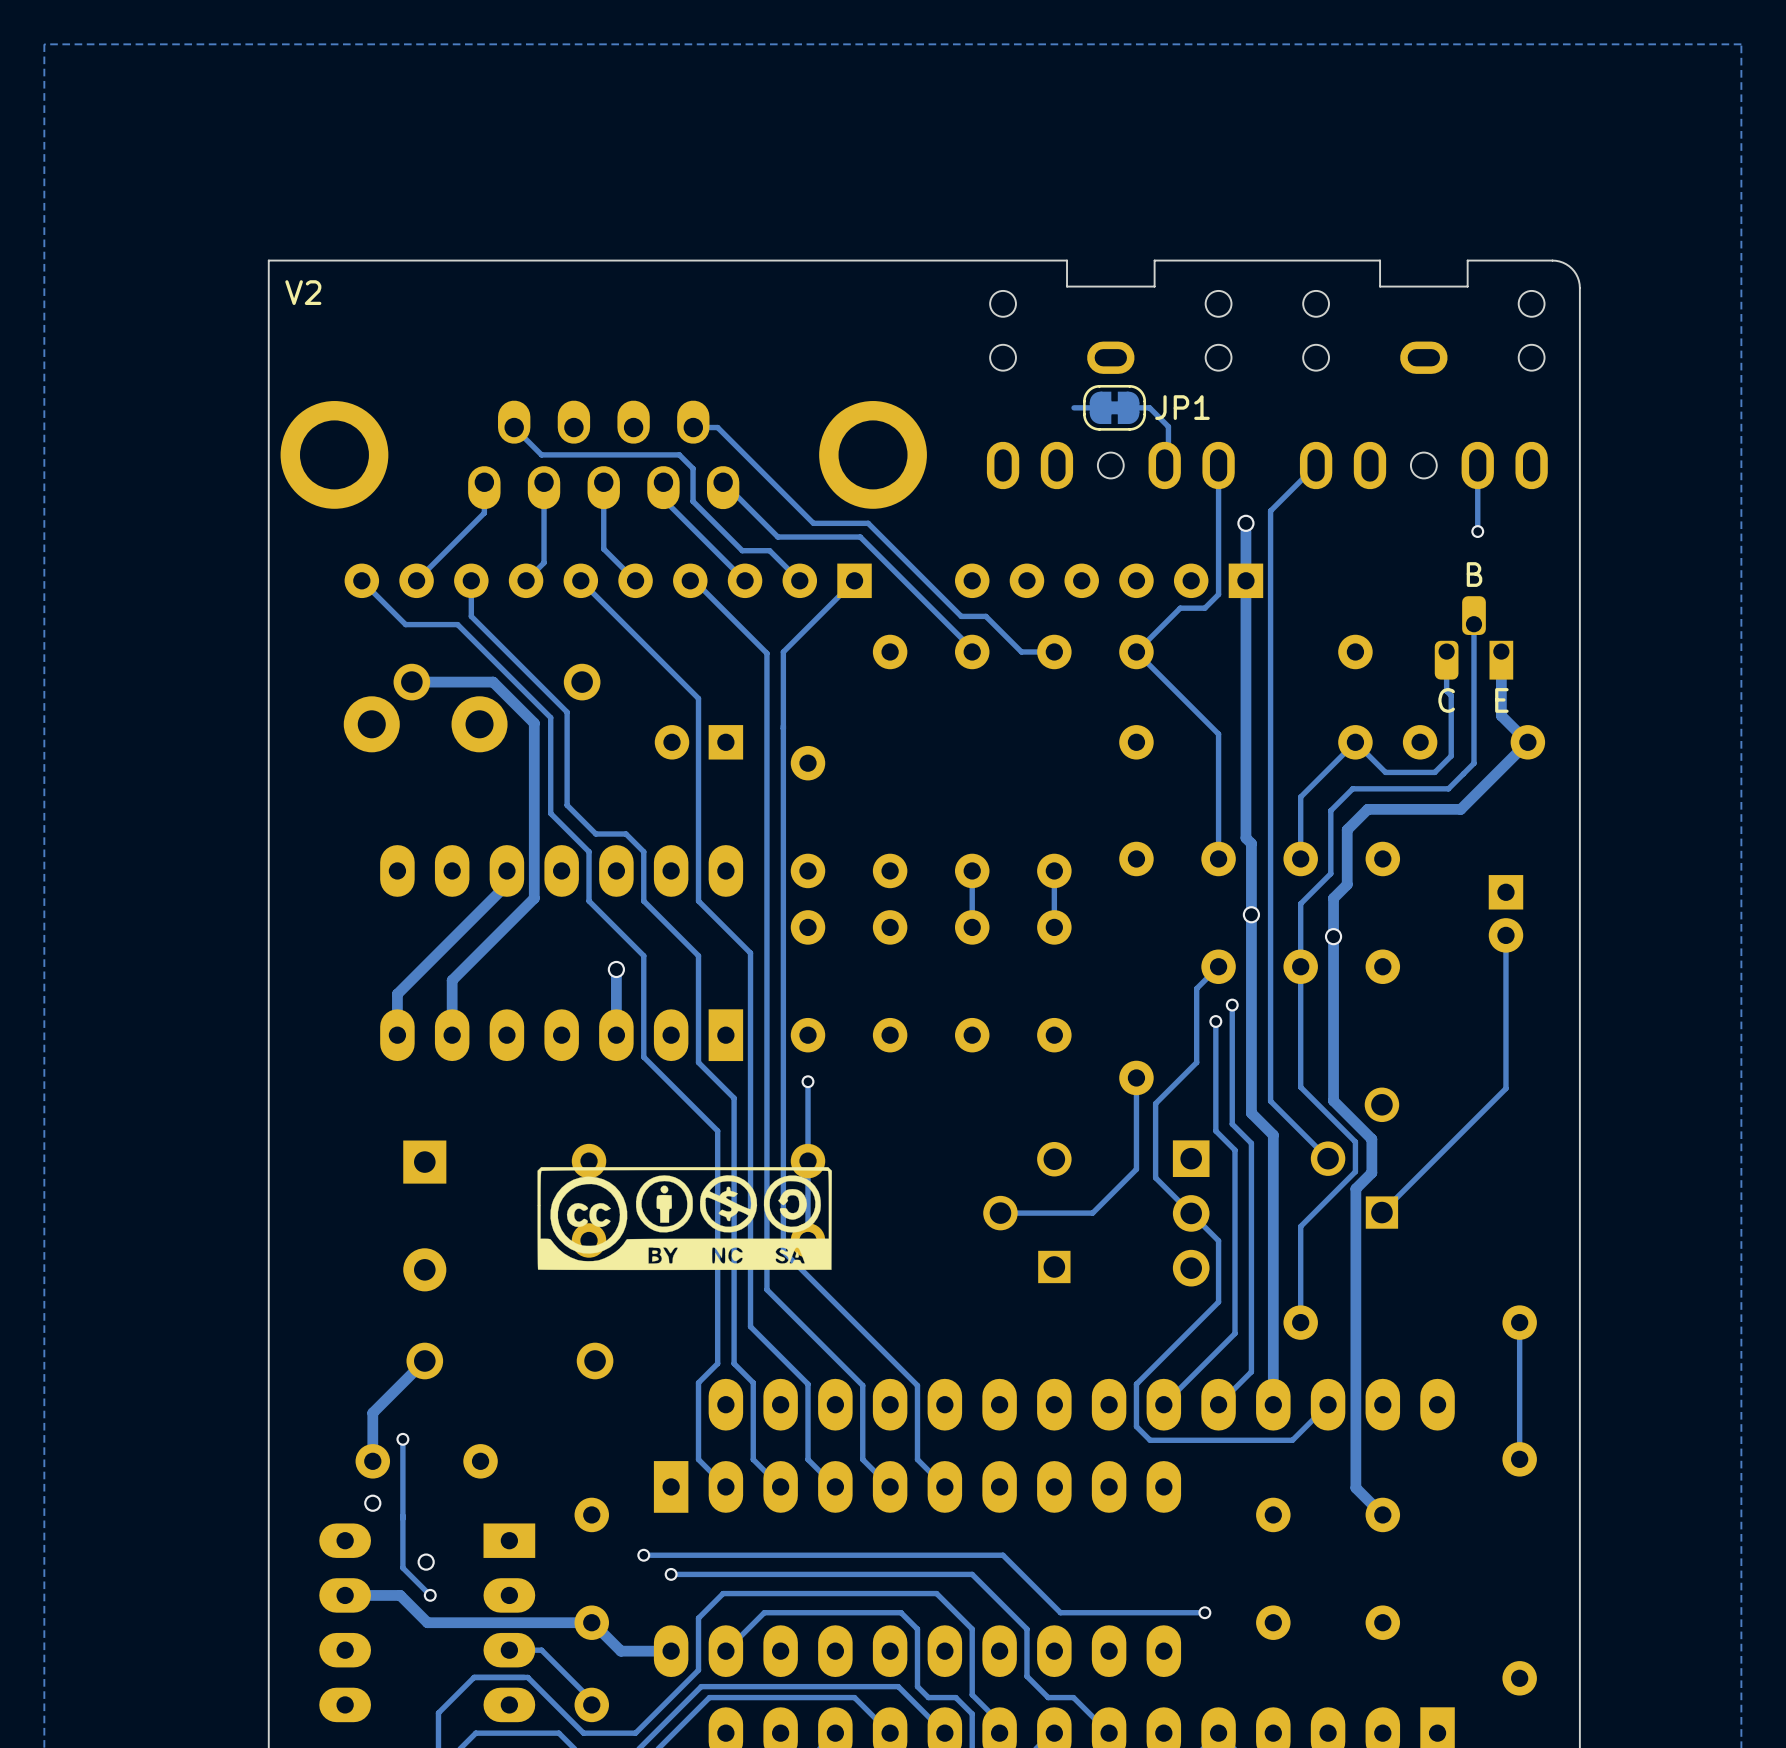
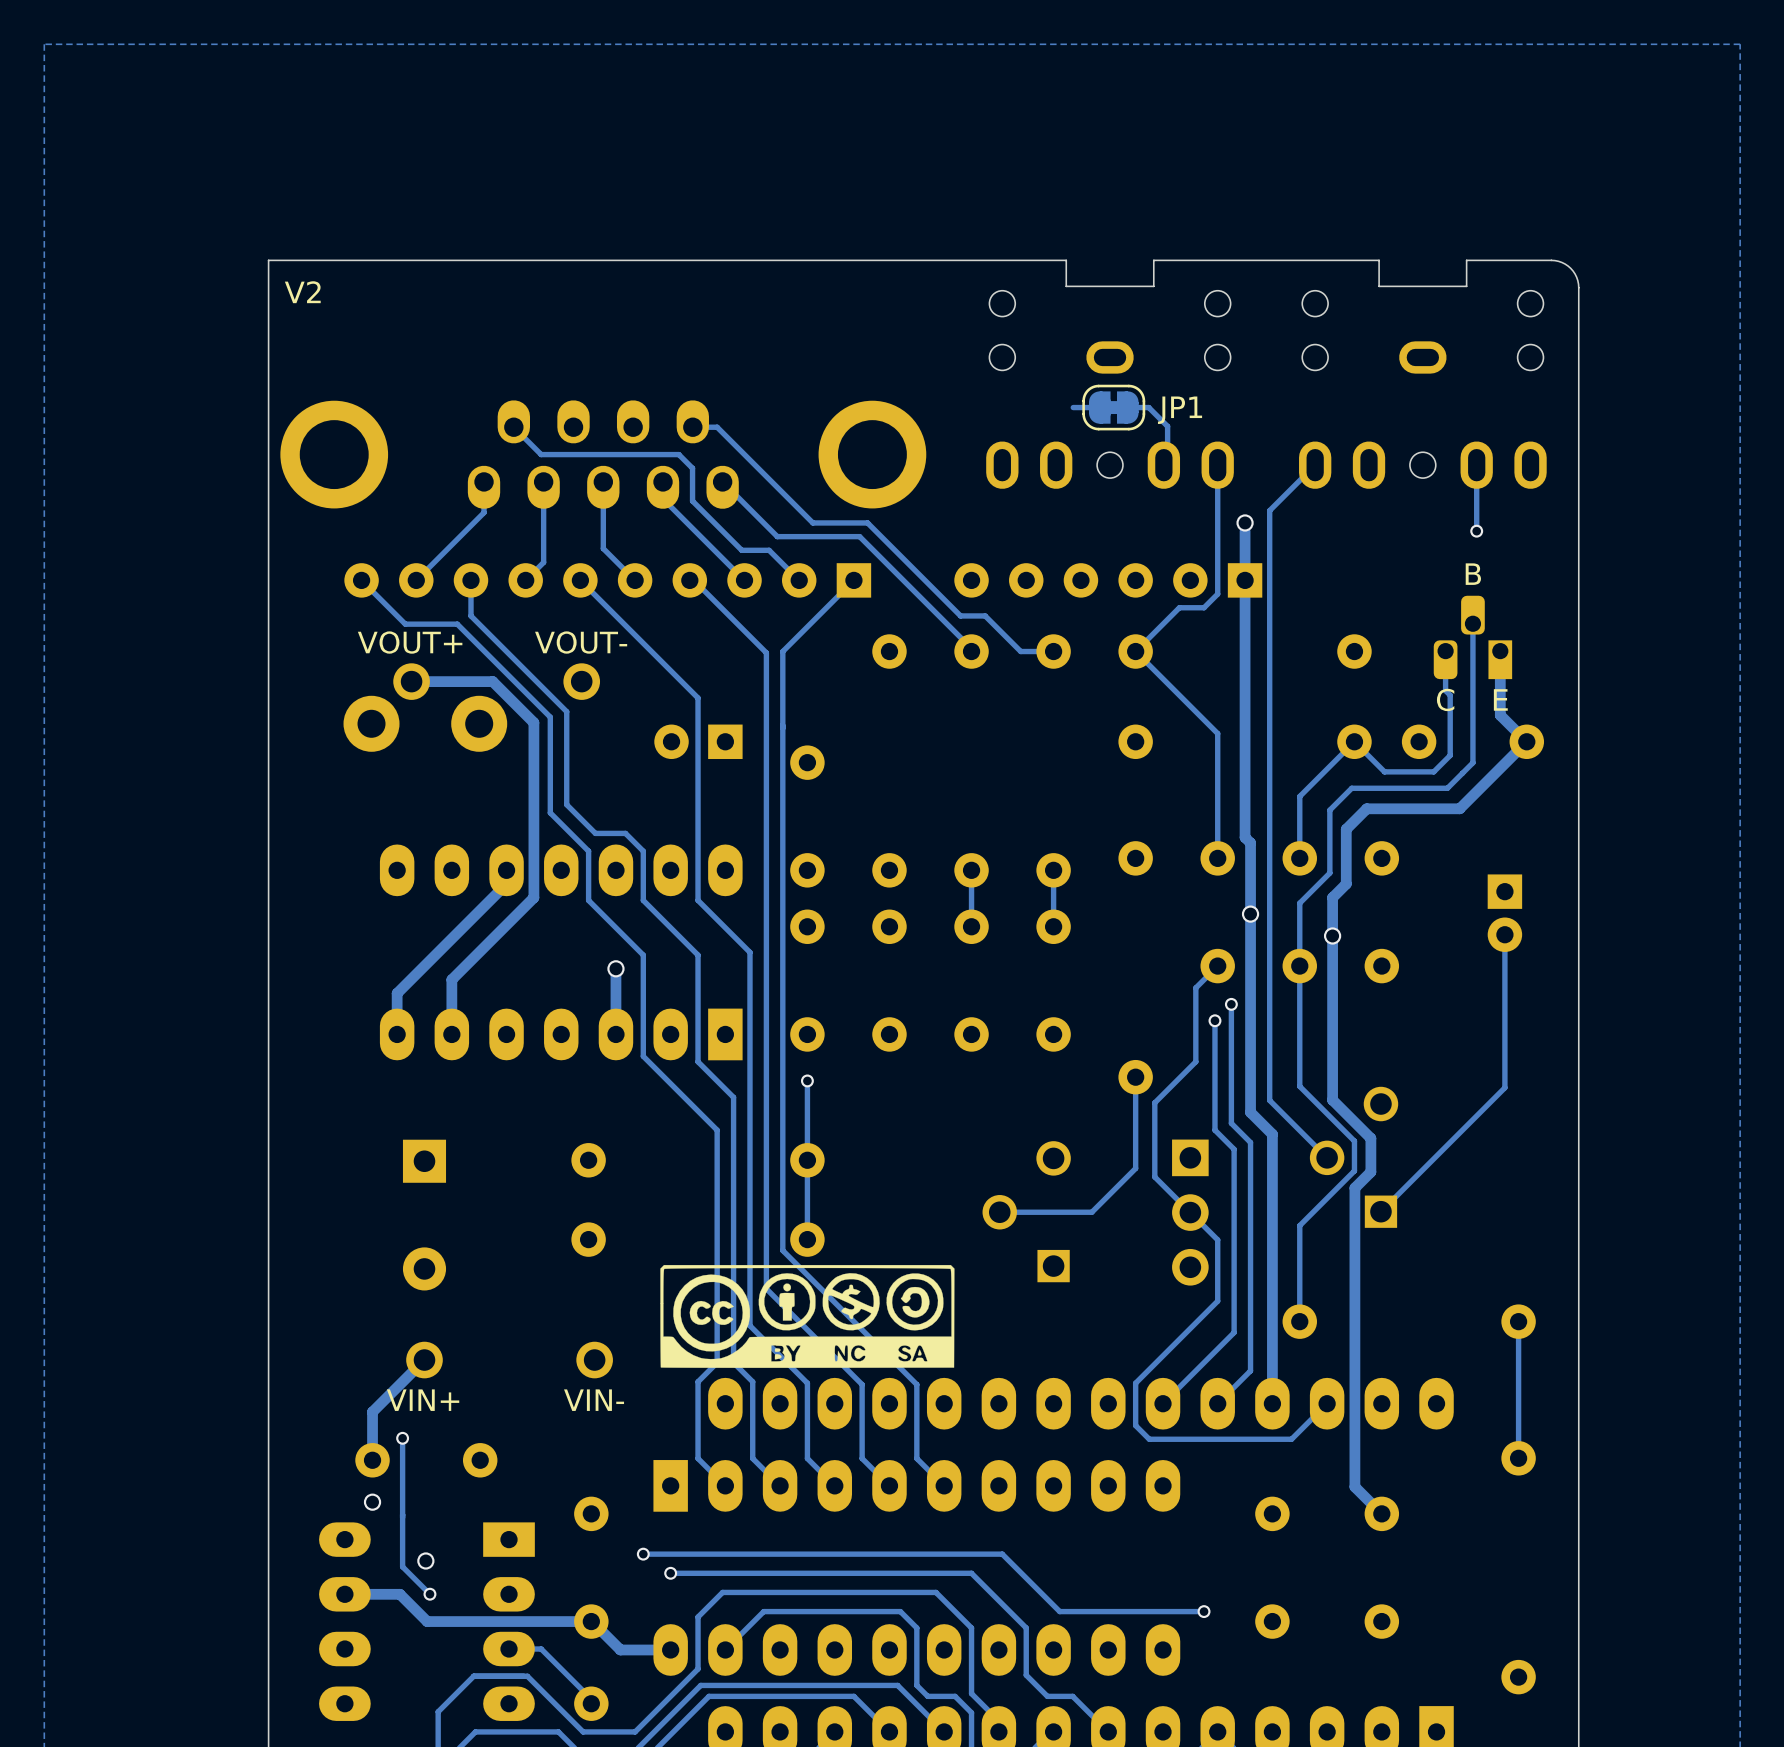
text: none -> VOUT+ (410, 642)
text: none -> VOUT- (581, 642)
drawing position: (684, 1218) -> (807, 1316)
text: none -> VIN+ (423, 1400)
text: none -> VIN- (594, 1400)

